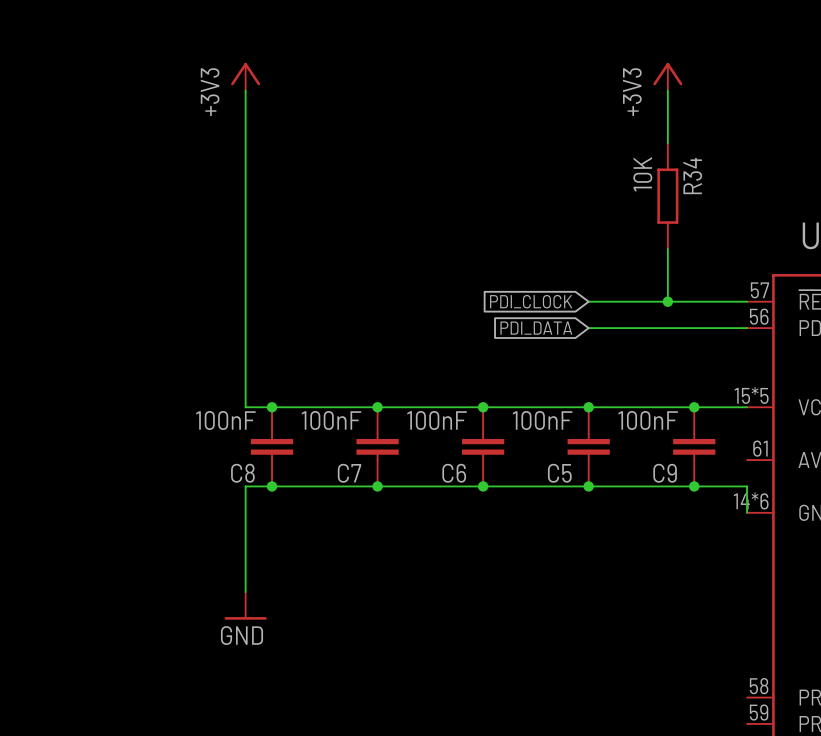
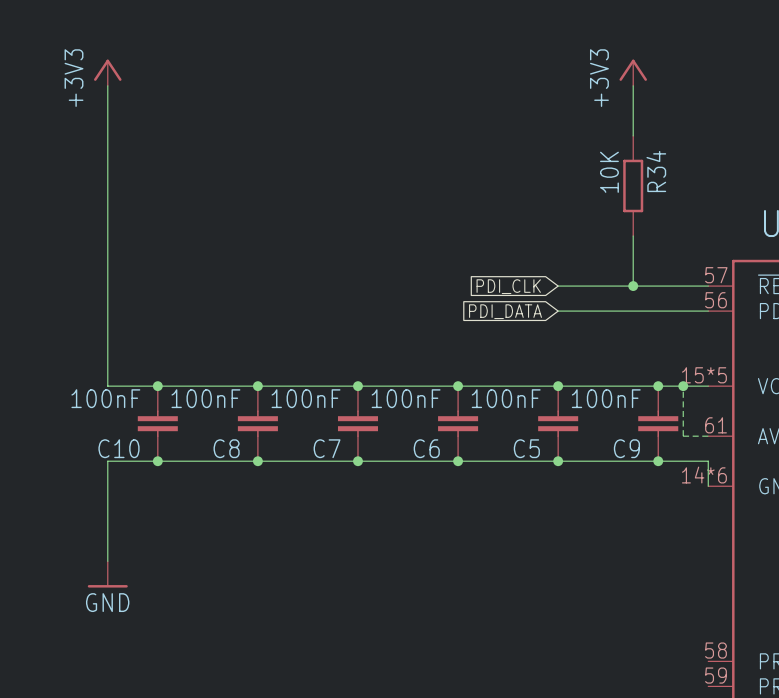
power symbol position: +3V3 (245, 76) -> +3V3 (107, 72)
wire: (245, 90) (245, 407) -> (107, 85) (107, 386) (232, 386)
global label: PDI_CLOCK (531, 301) -> PDI_CLK (508, 286)
junction: none -> (157, 386)
wire: none -> (683, 386) (683, 436) (708, 436)
junction: none -> (683, 386)
C10: none -> 100nF (157, 423)
junction: none -> (157, 461)
wire: (245, 486) (245, 592) -> (232, 461) (107, 461) (107, 561)
power symbol position: GND (245, 605) -> GND (107, 574)

